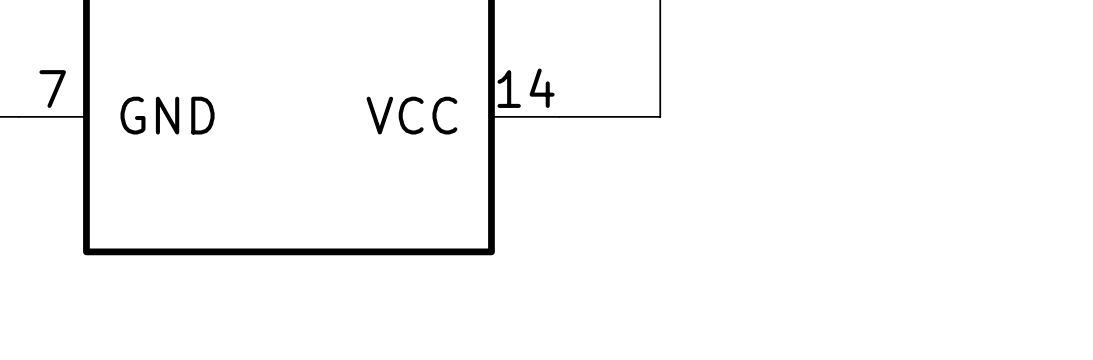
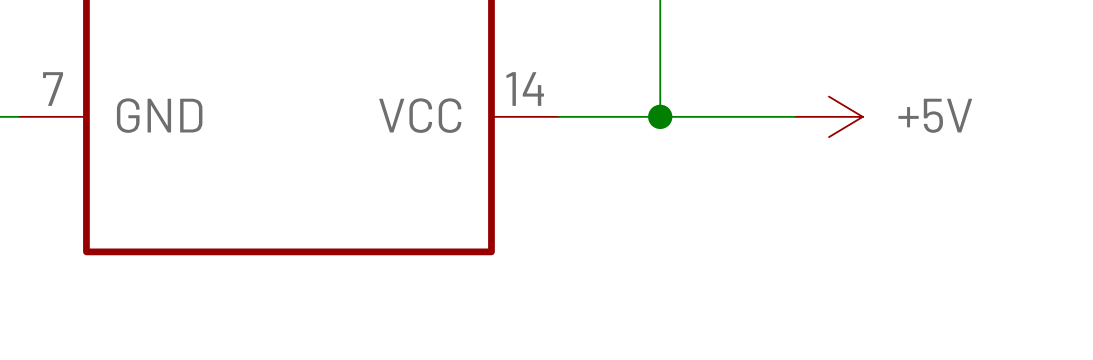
wire: none -> (660, 116) (795, 116)
junction: none -> (660, 116)
power symbol: none -> +5V (829, 116)

